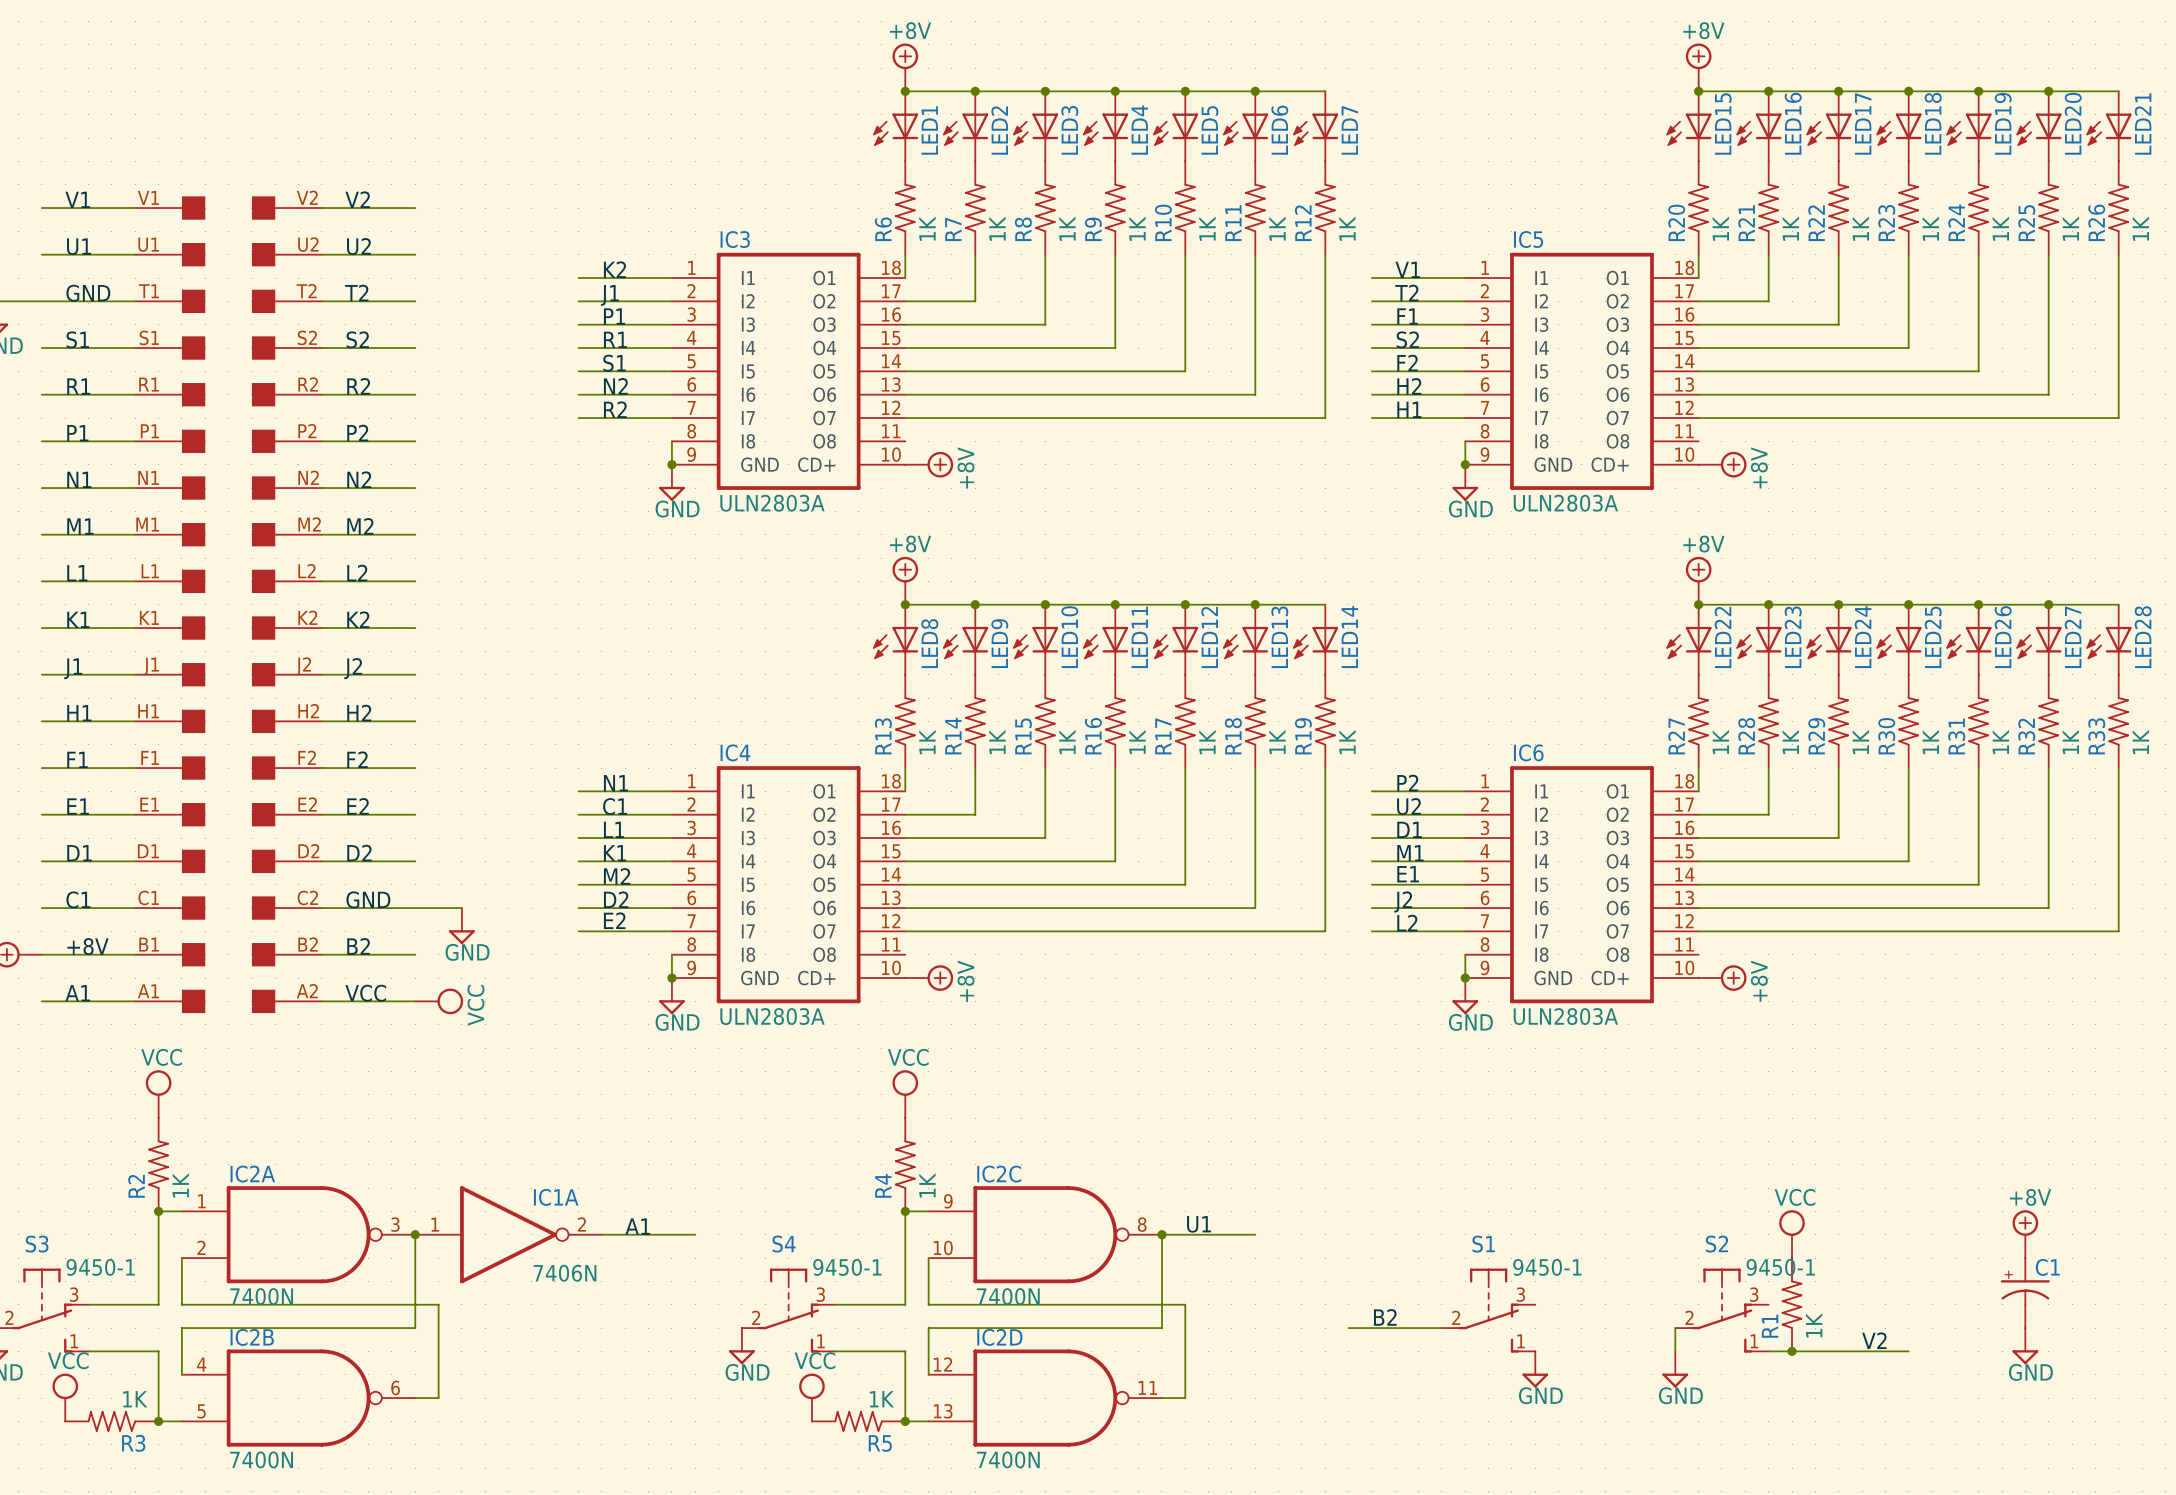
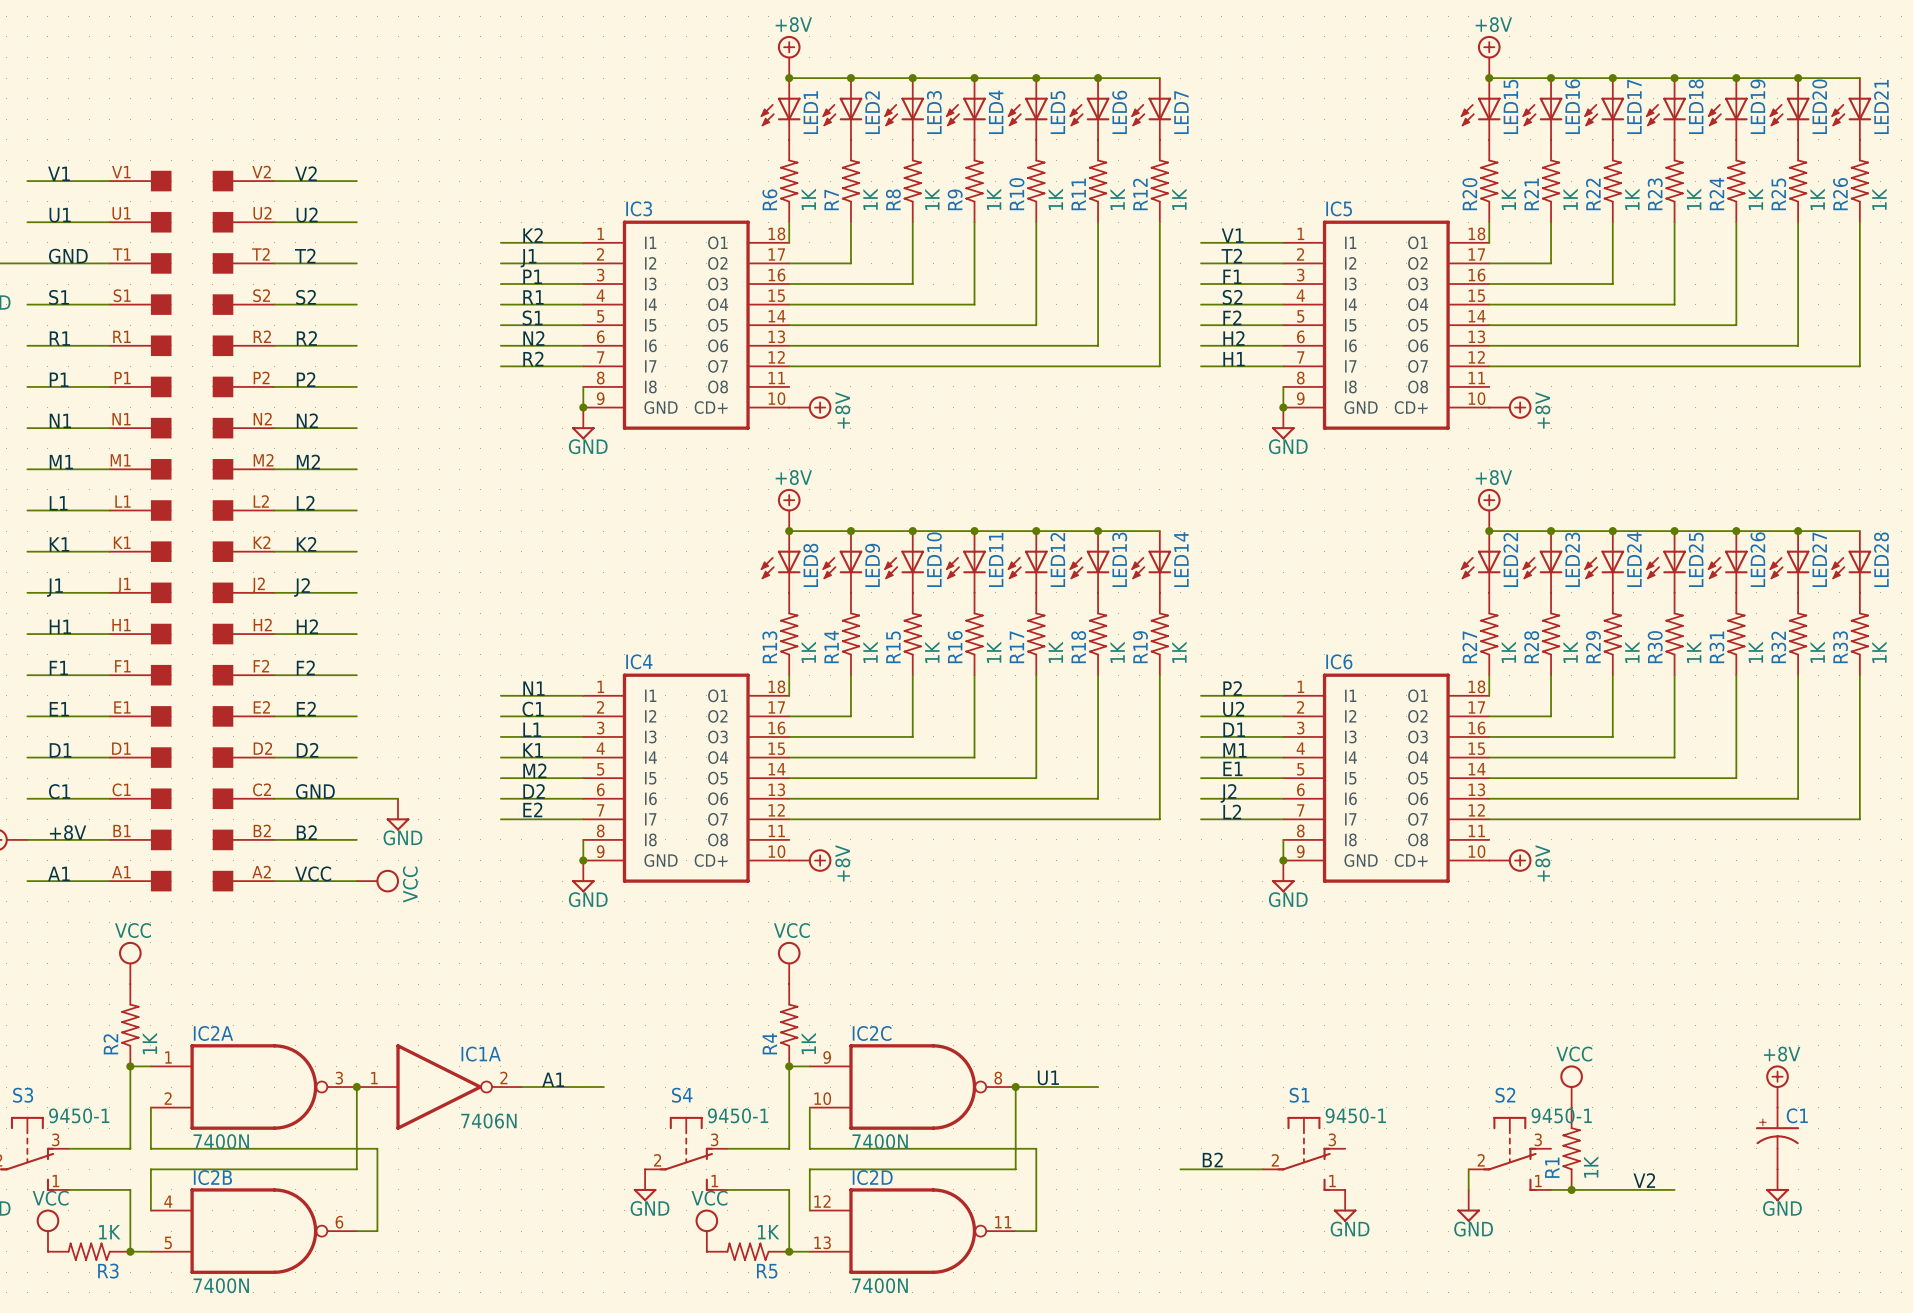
IC3 value: ULN2803A (772, 503) -> none
IC5 value: ULN2803A (1565, 503) -> none
IC4 value: ULN2803A (772, 1016) -> none
IC6 value: ULN2803A (1565, 1016) -> none

